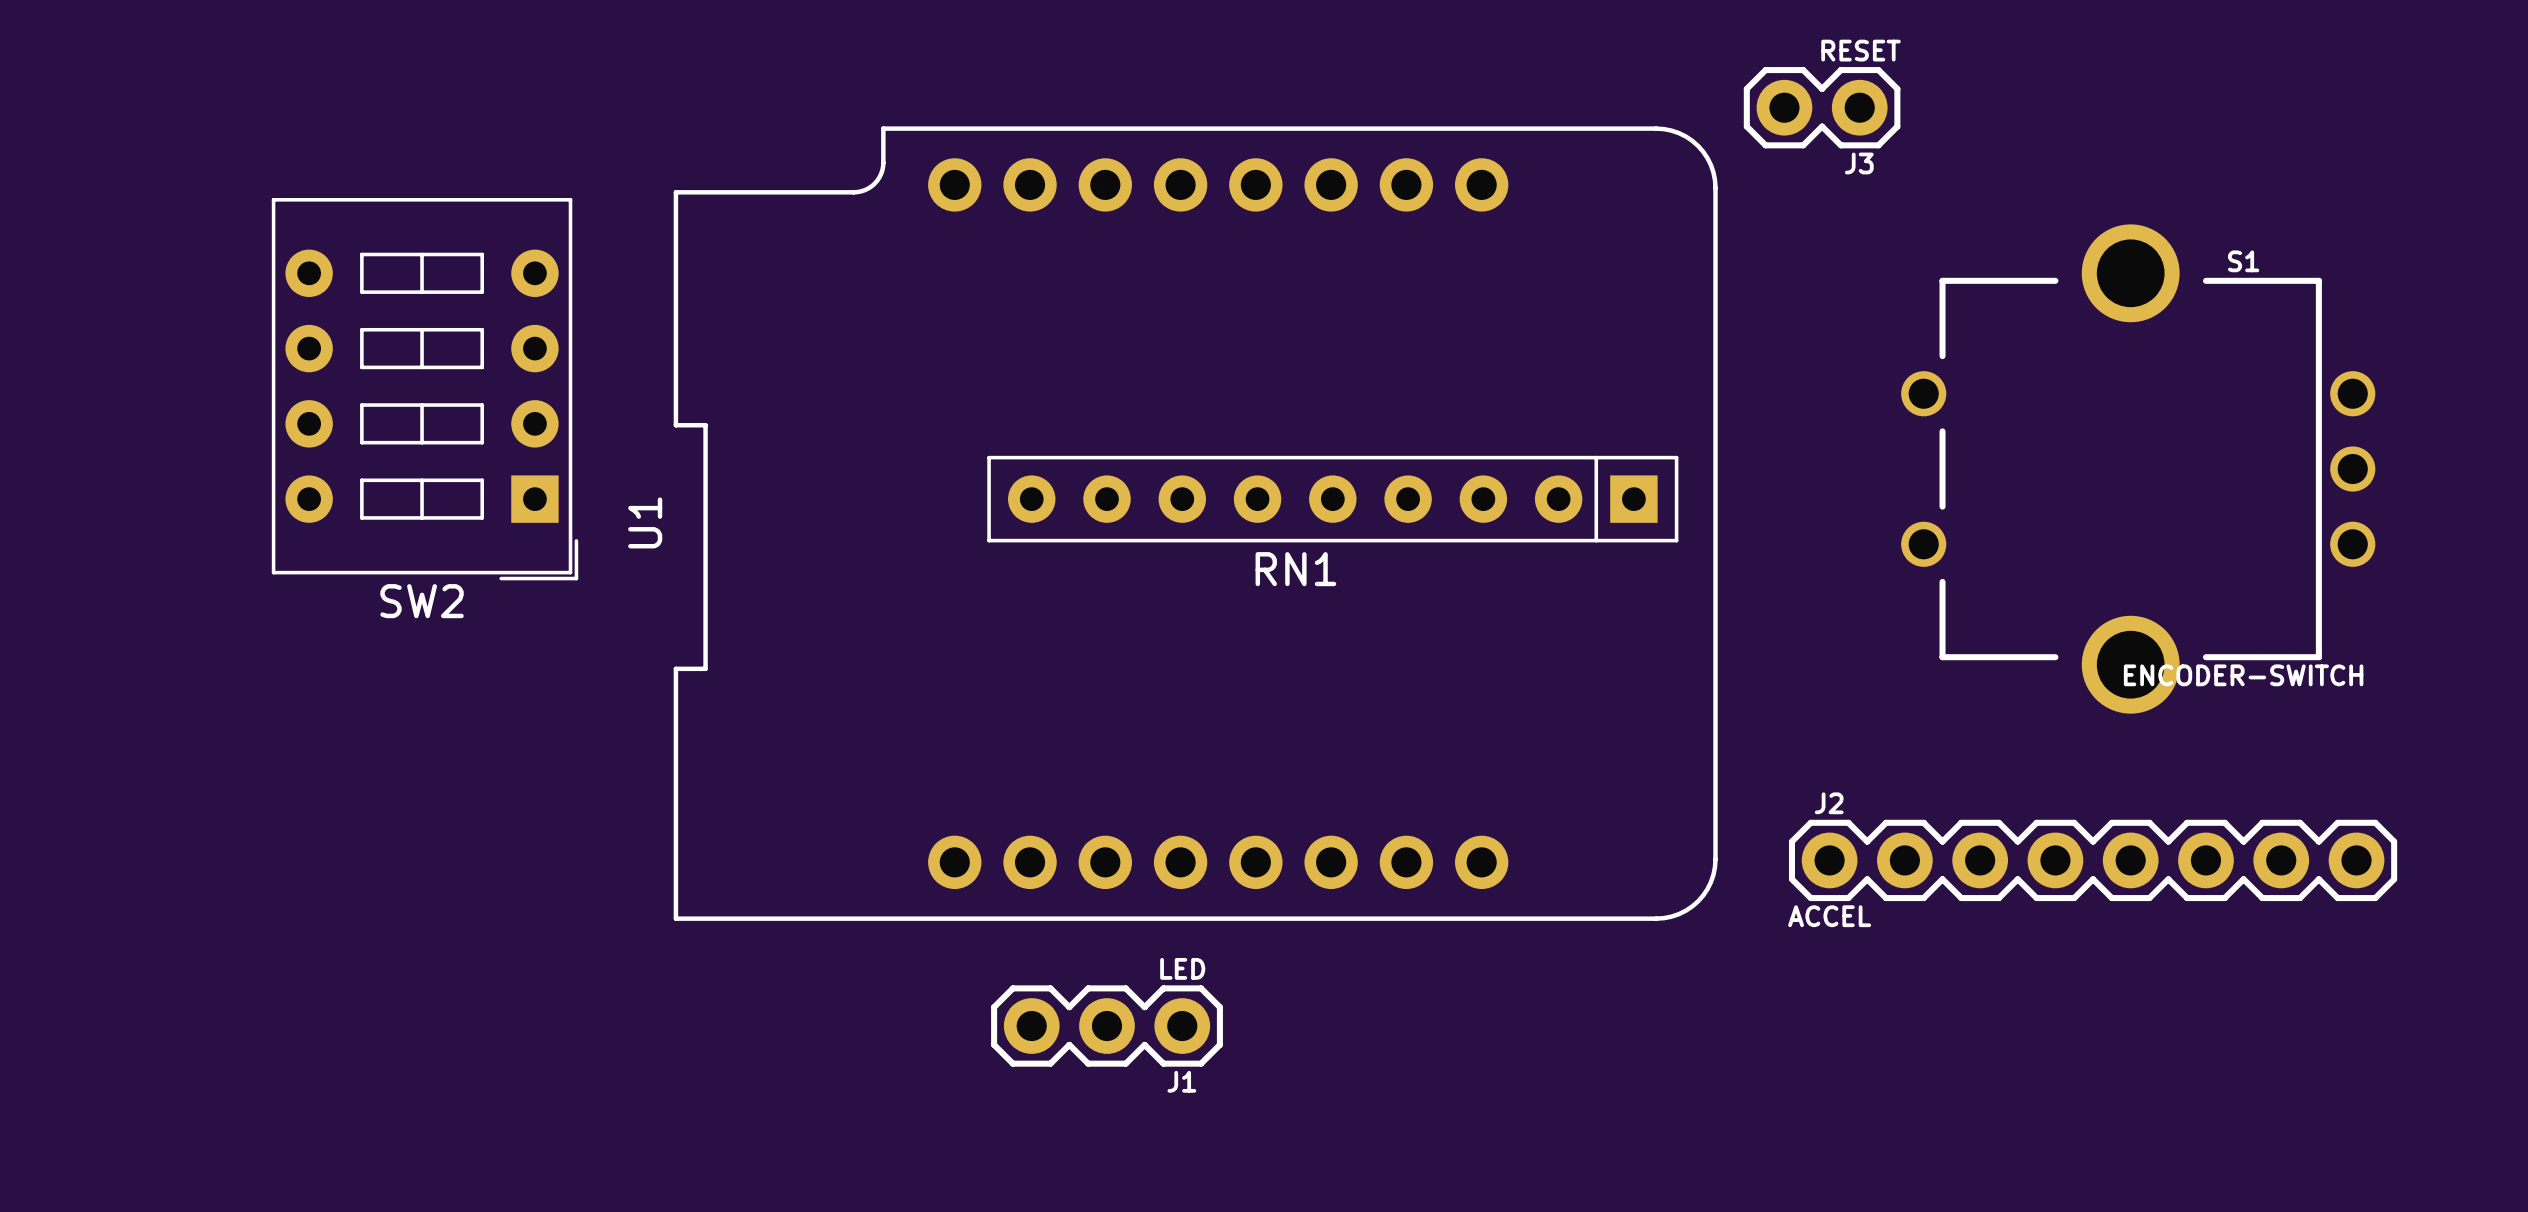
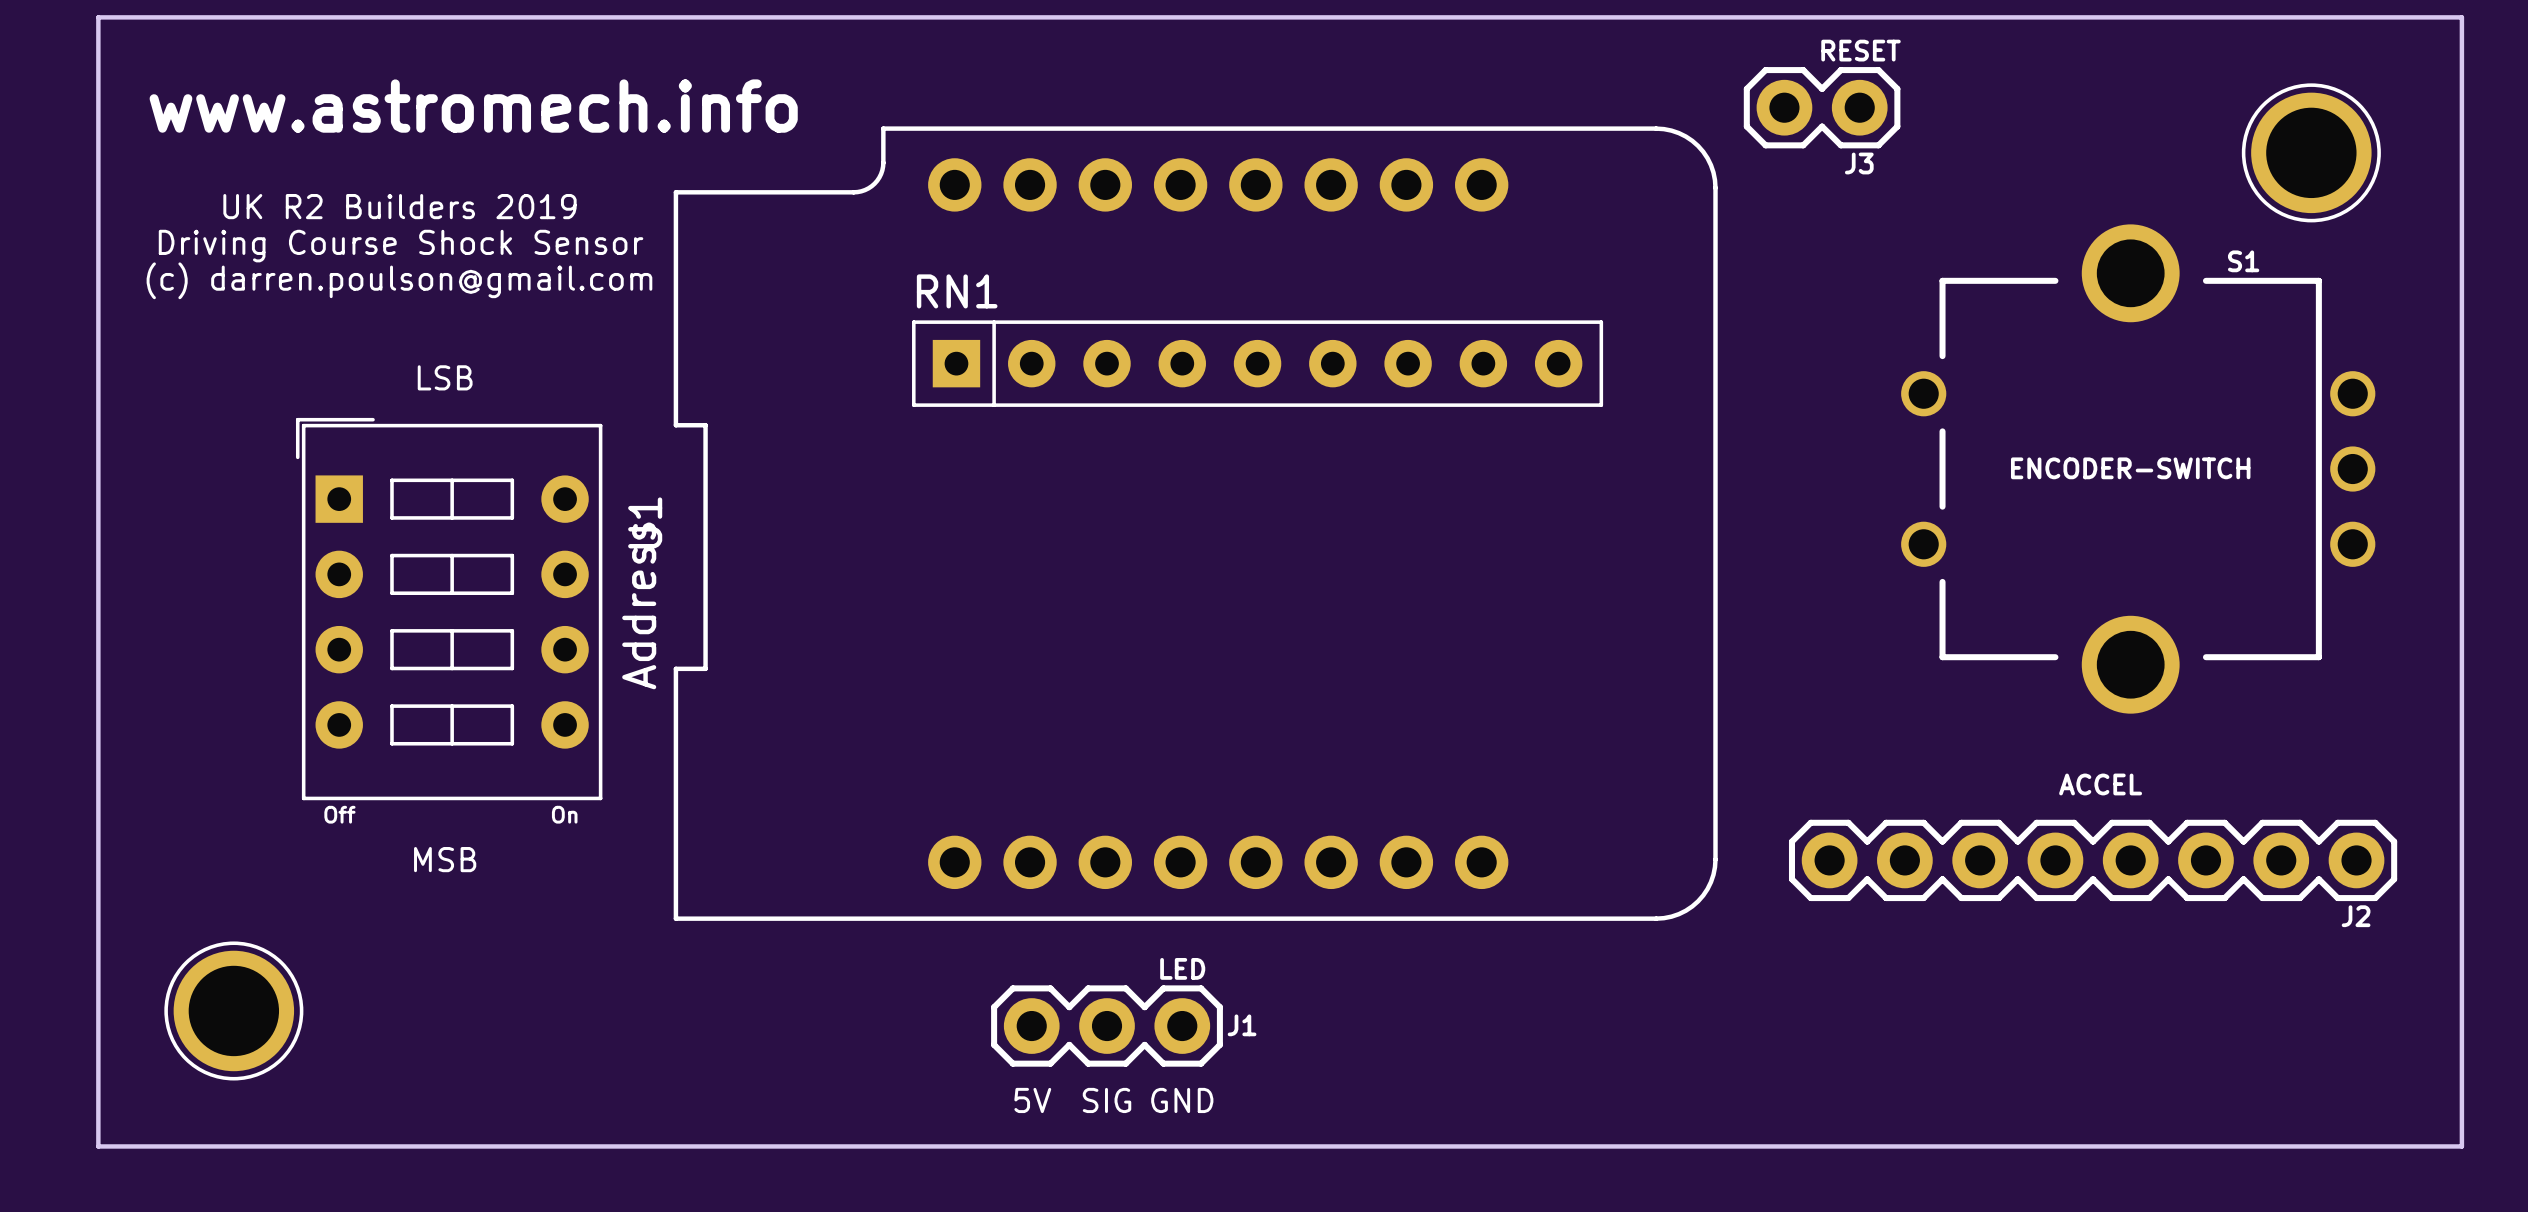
board edge: none -> (98, 17) (98, 1146) (2461, 1146) (2461, 17) (98, 17)
text: none -> www.astromech.info (473, 106)
part: none -> (2311, 152)
text: none -> UK R2 Builders 2019 (399, 206)
text: none -> Driving Course Shock Sensor (401, 246)
text: none -> (c) darren.poulson@gmail.com (399, 280)
text: none -> LSB (445, 377)
SW2: (425, 389) -> none
RN1 rotation: 0° (1332, 499) -> 180° (1257, 363)
RN1 name position: RN1 (1295, 569) -> RN1 (957, 291)
Address: none -> (449, 609)
S1 value position: ENCODER-SWITCH (2243, 675) -> ENCODER-SWITCH (2130, 468)
J2 name position: J2 (1829, 803) -> J2 (2356, 916)
text: none -> Off (339, 814)
text: none -> On (564, 814)
text: none -> MSB (445, 859)
J2 value position: ACCEL (1829, 916) -> ACCEL (2100, 784)
part: none -> (233, 1010)
J1 name position: J1 (1181, 1081) -> J1 (1242, 1025)
text: none -> 5V (1032, 1100)
text: none -> SIG (1107, 1100)
text: none -> GND (1182, 1100)

